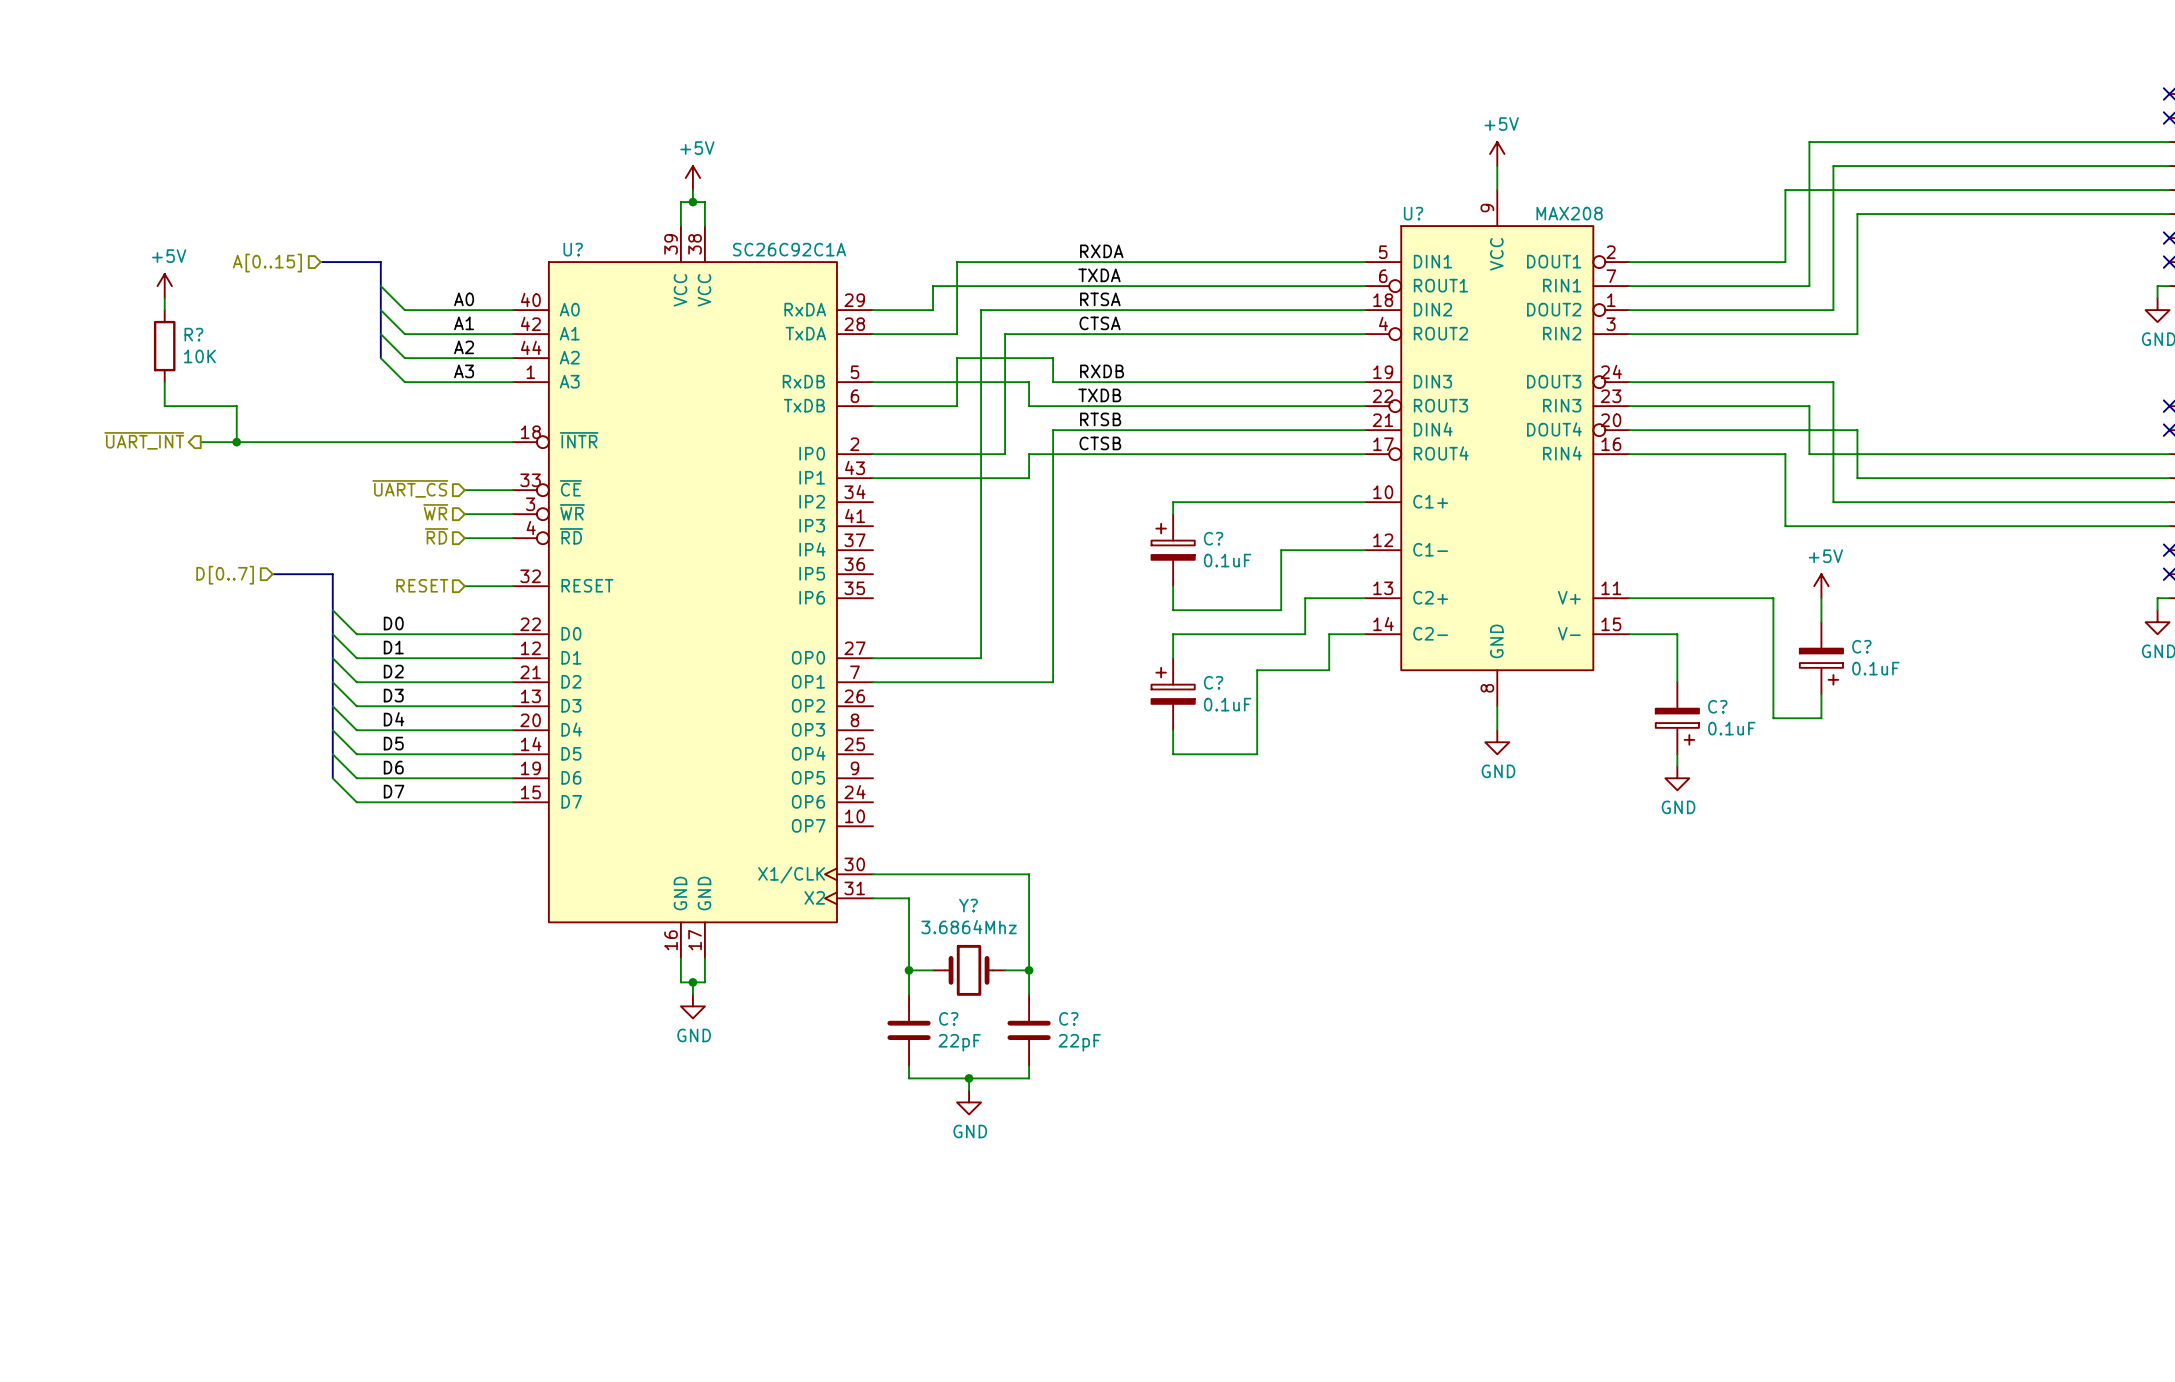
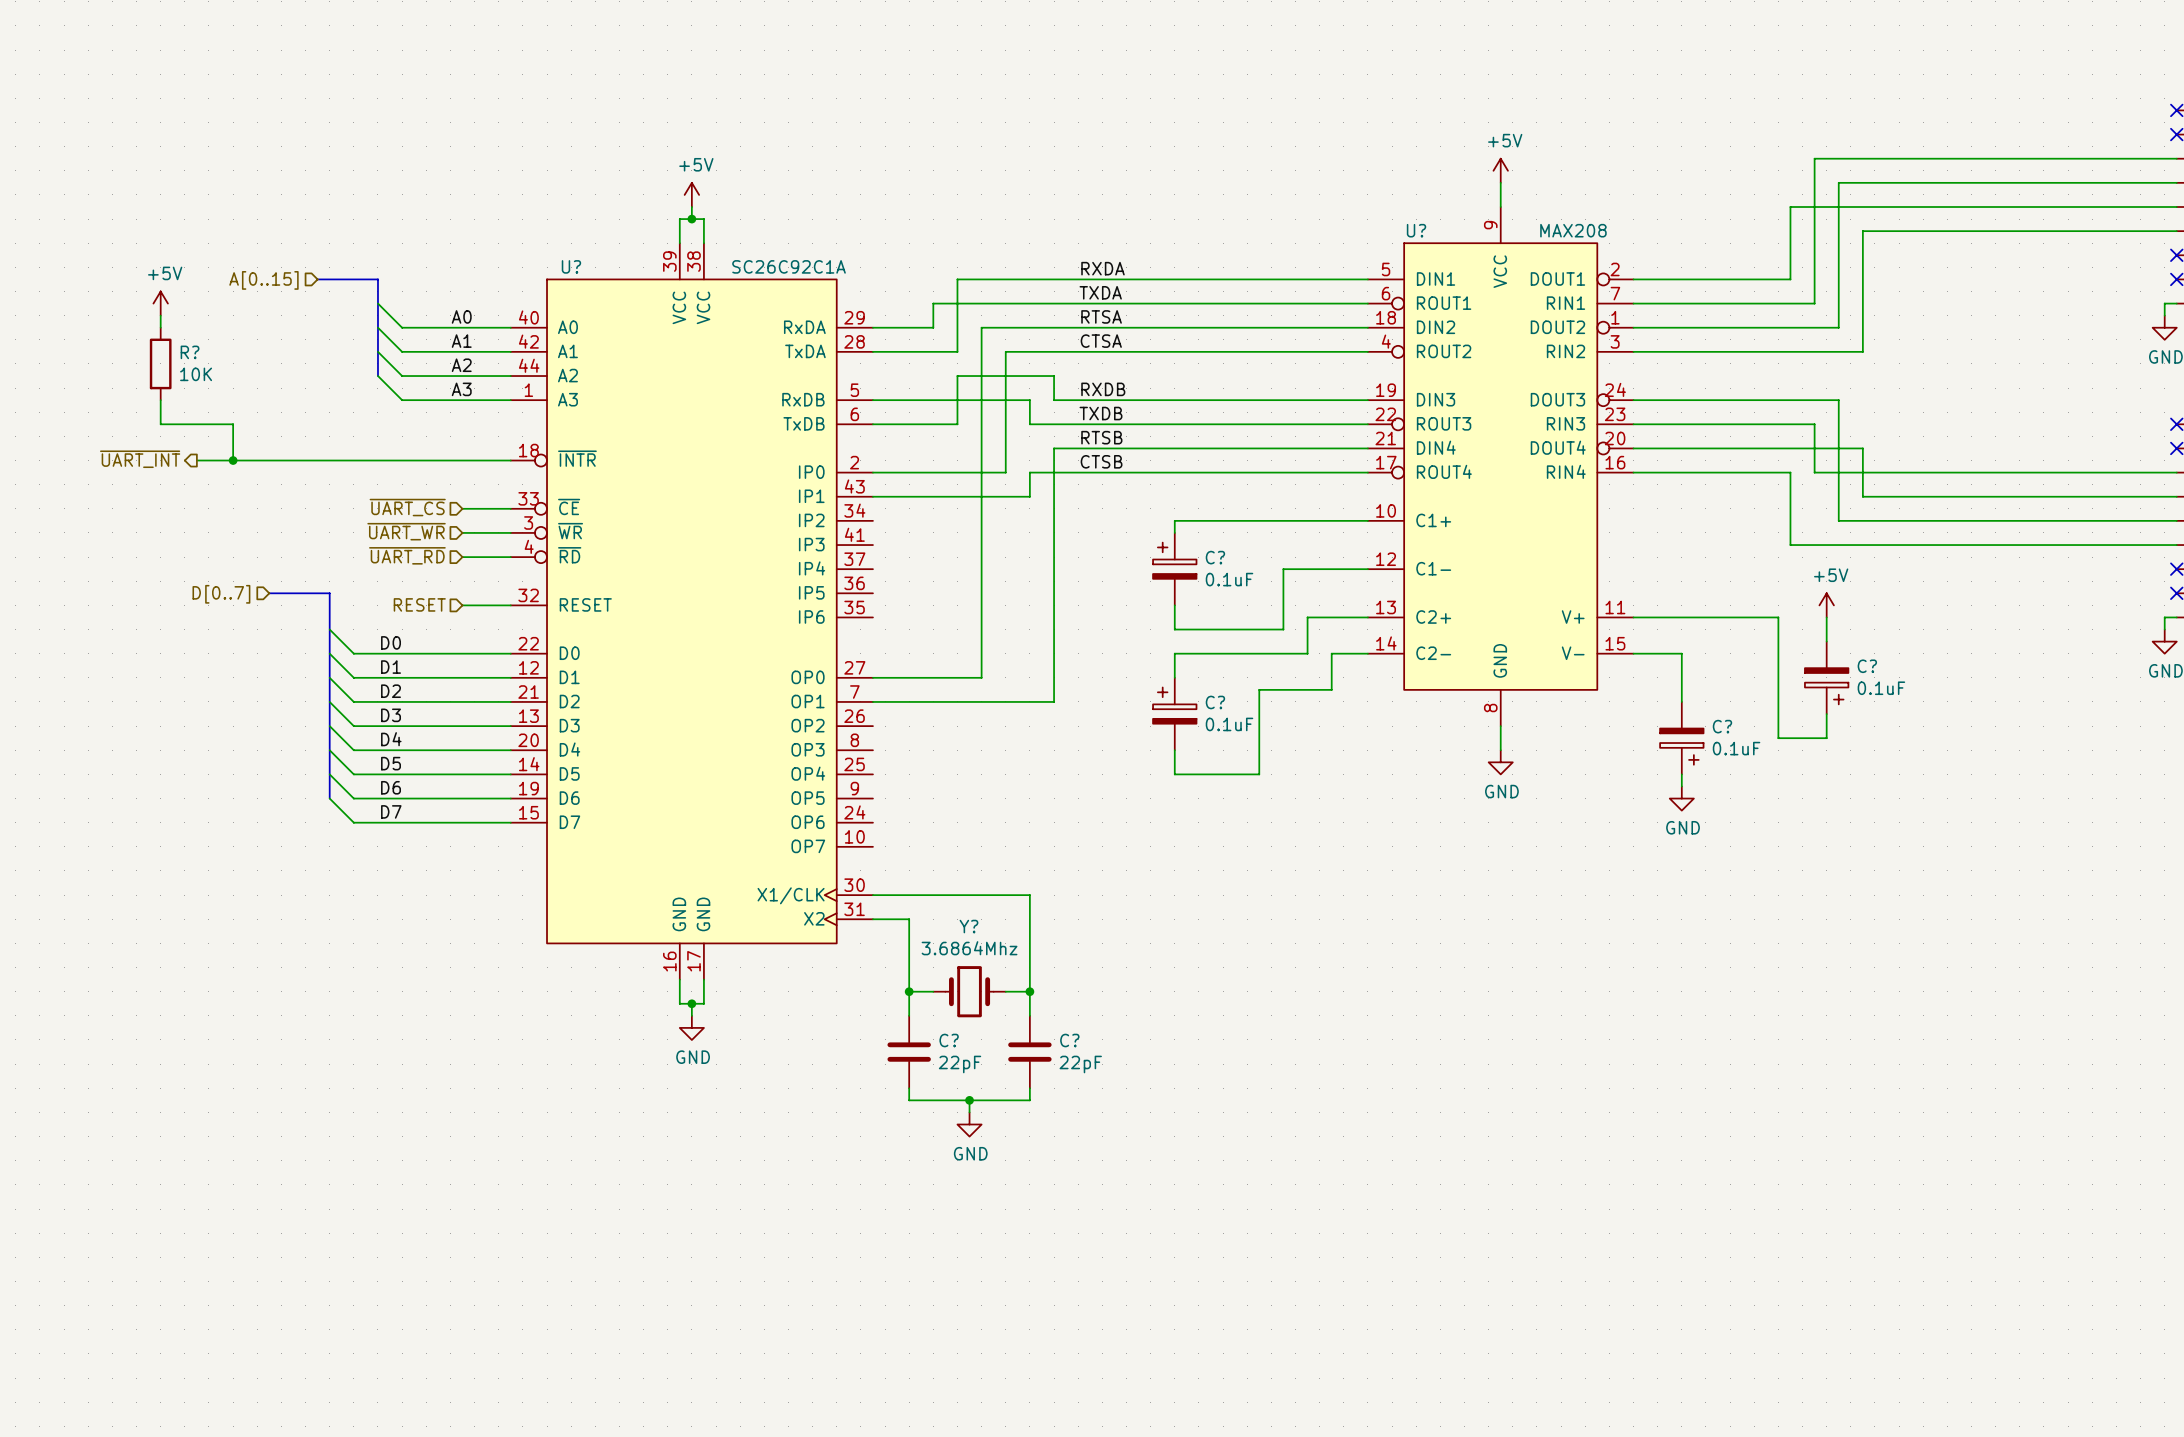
hierarchical label: ~{WR} (435, 512) -> ~{UART_WR} (406, 531)
hierarchical label: ~{RD} (436, 536) -> ~{UART_RD} (407, 555)

